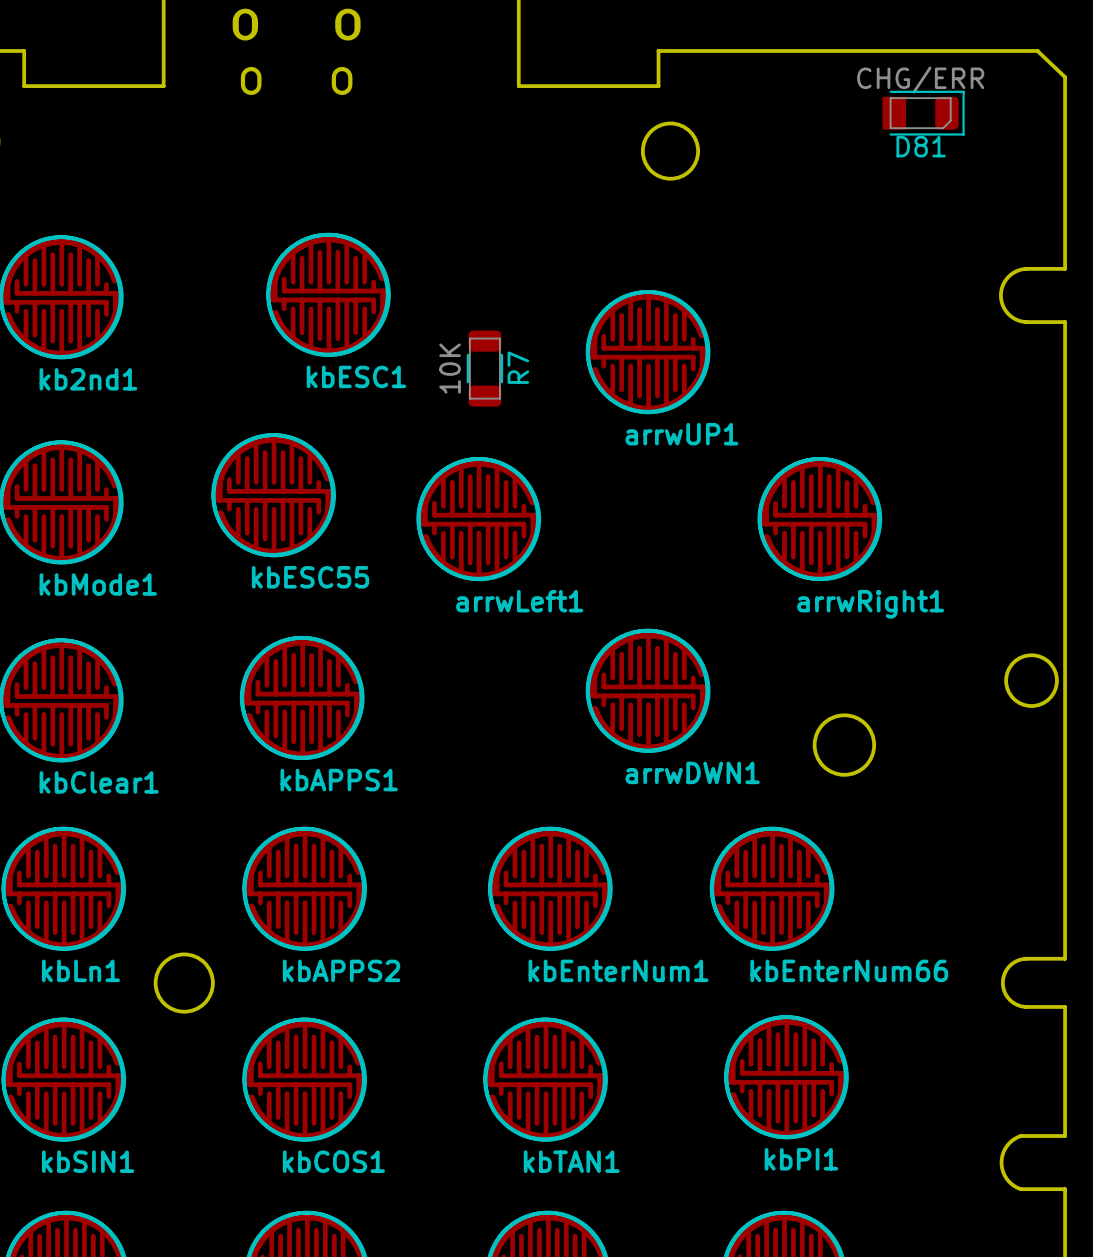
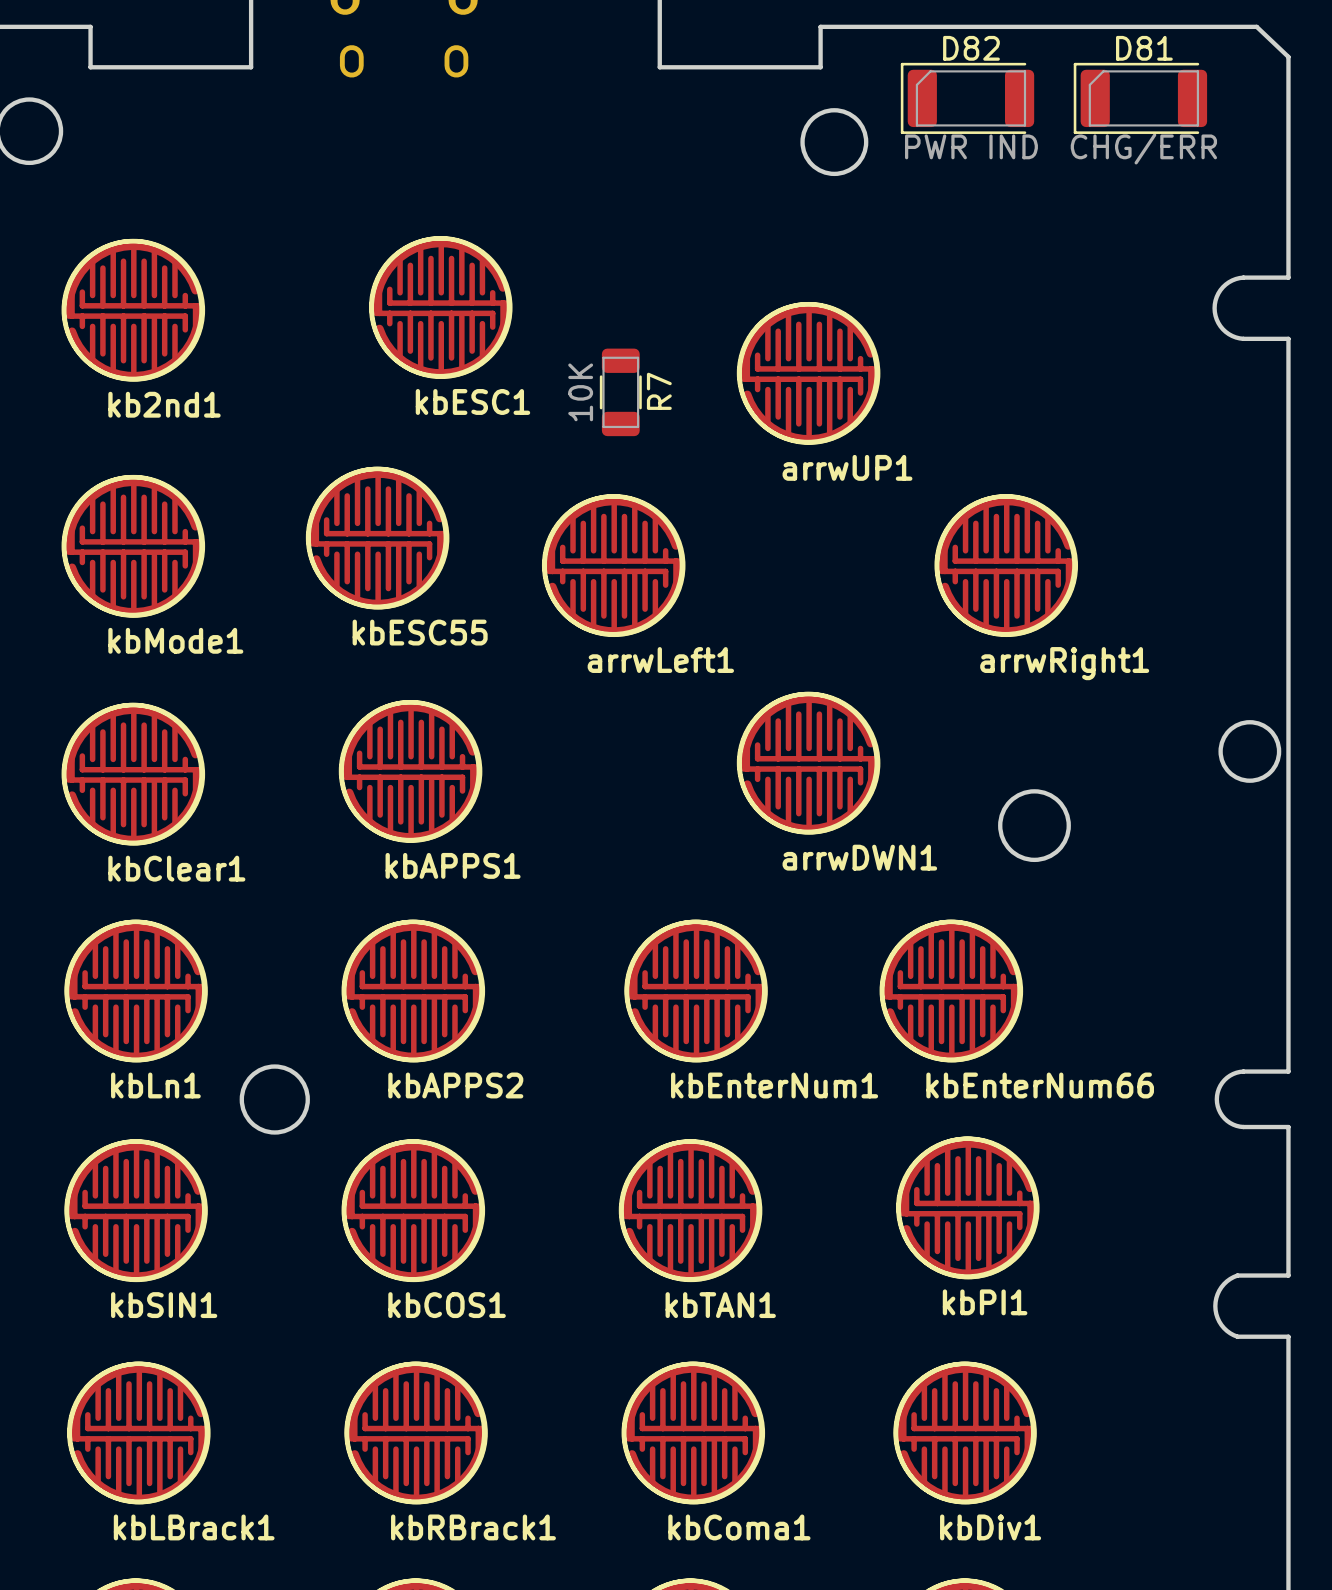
D81 value position: CHG/ERR (920, 80) -> CHG/ERR (1143, 148)
D81 footprint: [882, 90, 965, 136] -> [1073, 62, 1208, 134]
D82: none -> PWR IND (967, 98)
D81 name position: D81 (921, 146) -> D81 (1144, 48)

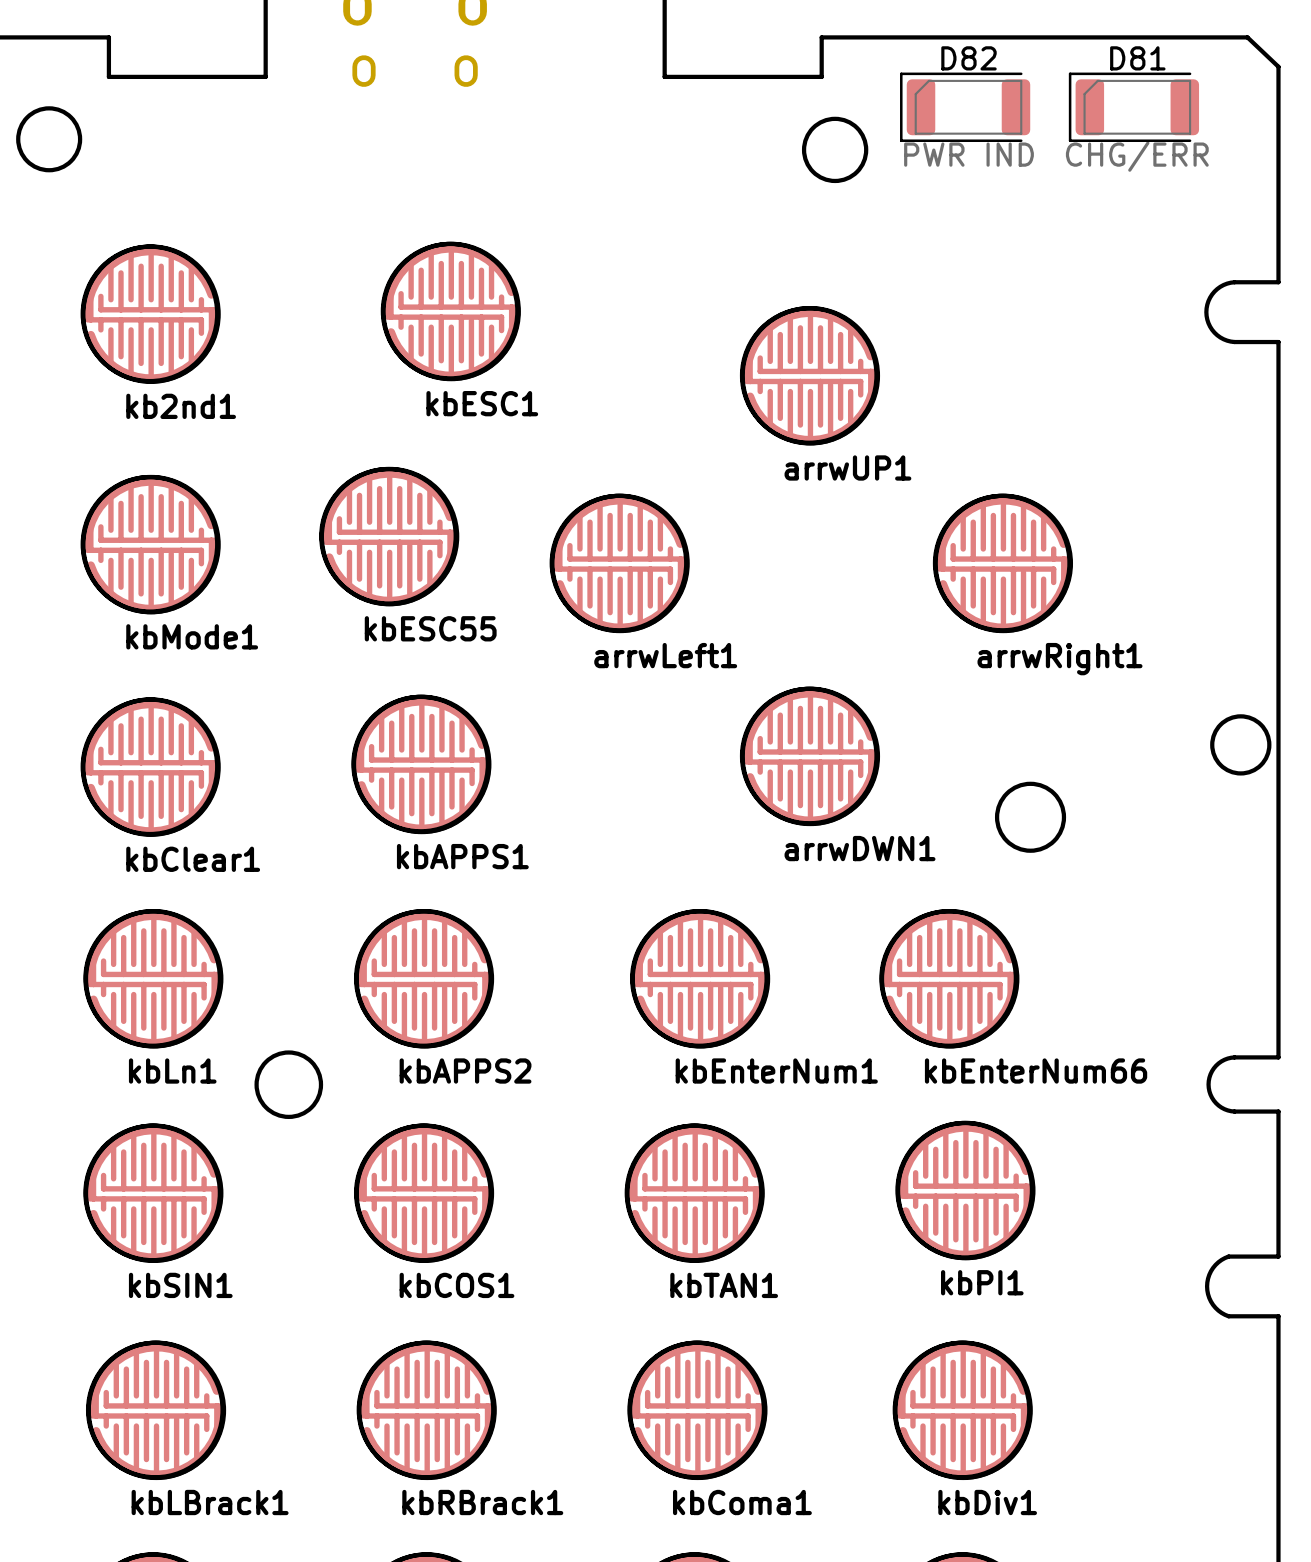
R7: 10K (620, 392) -> none

